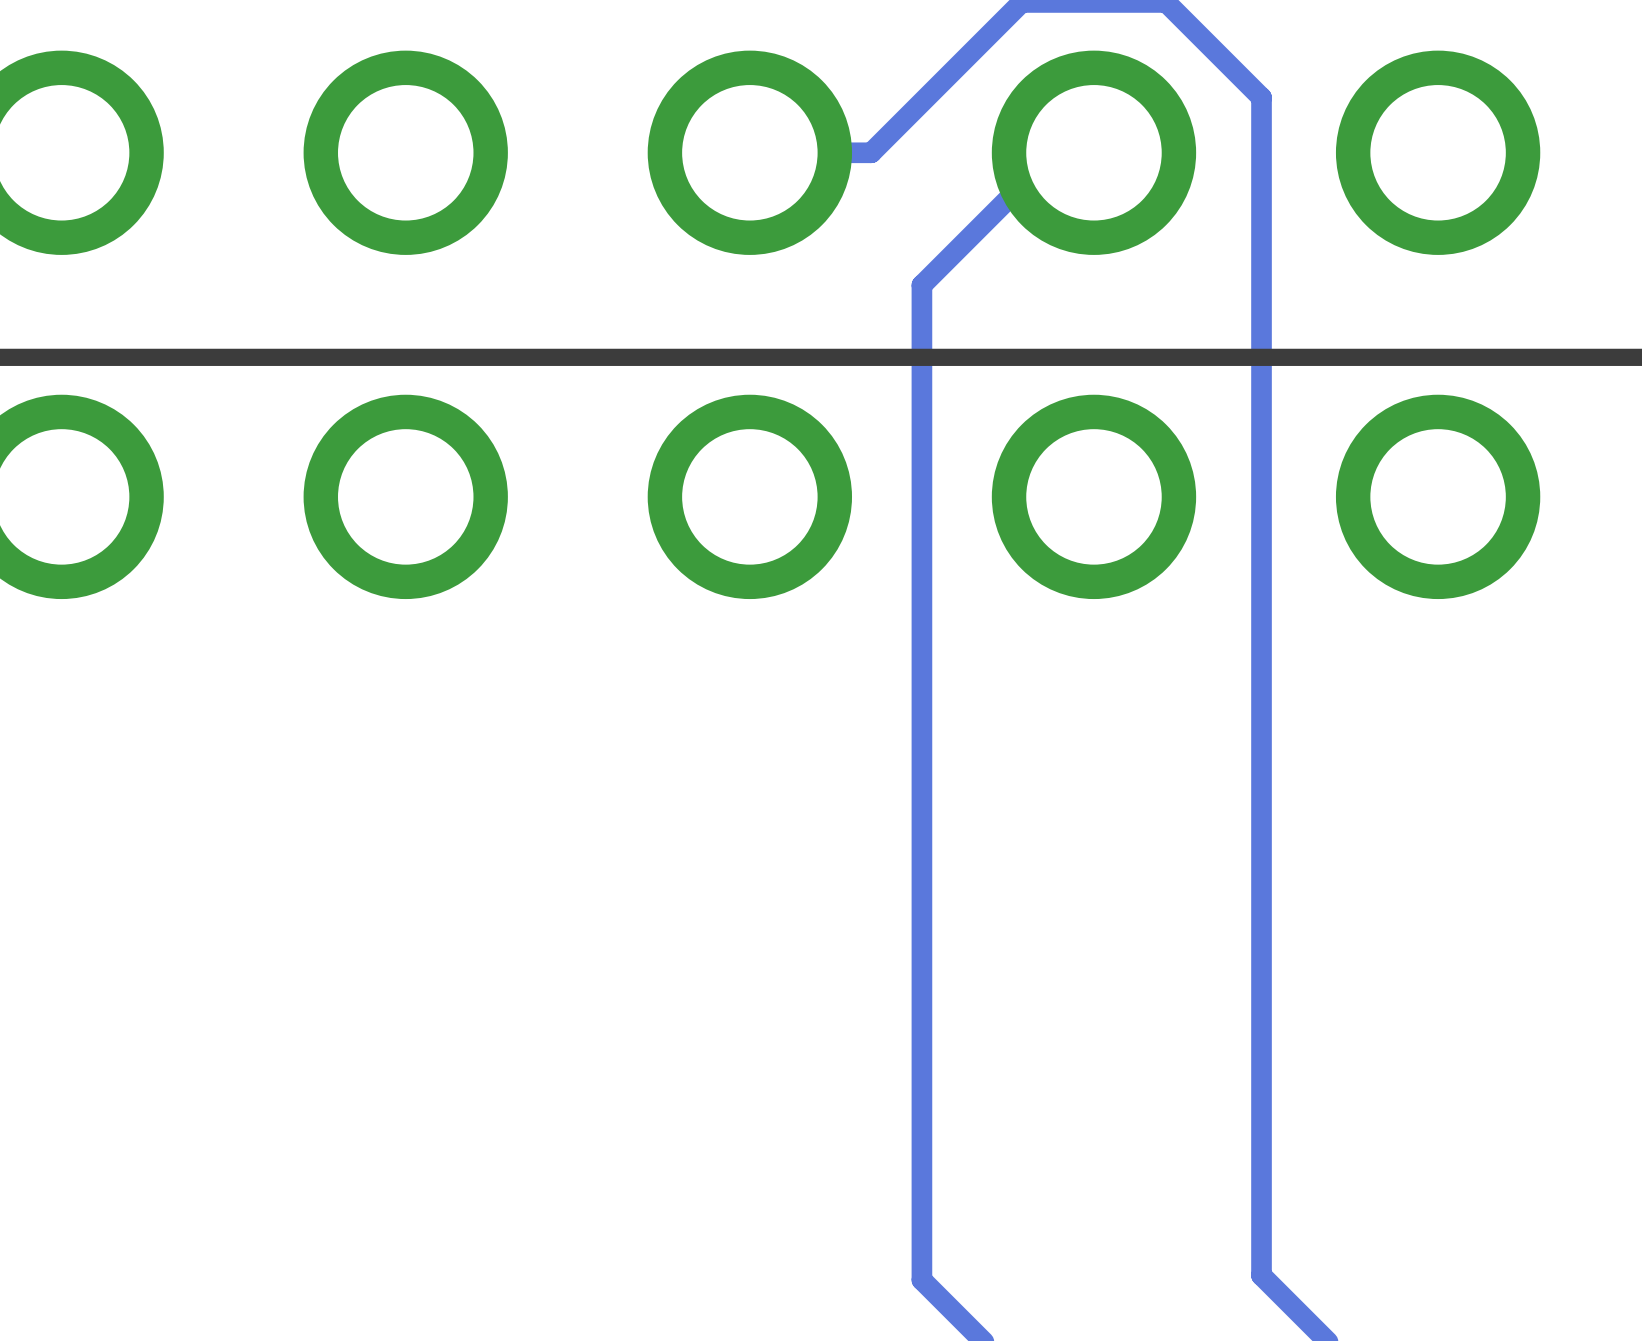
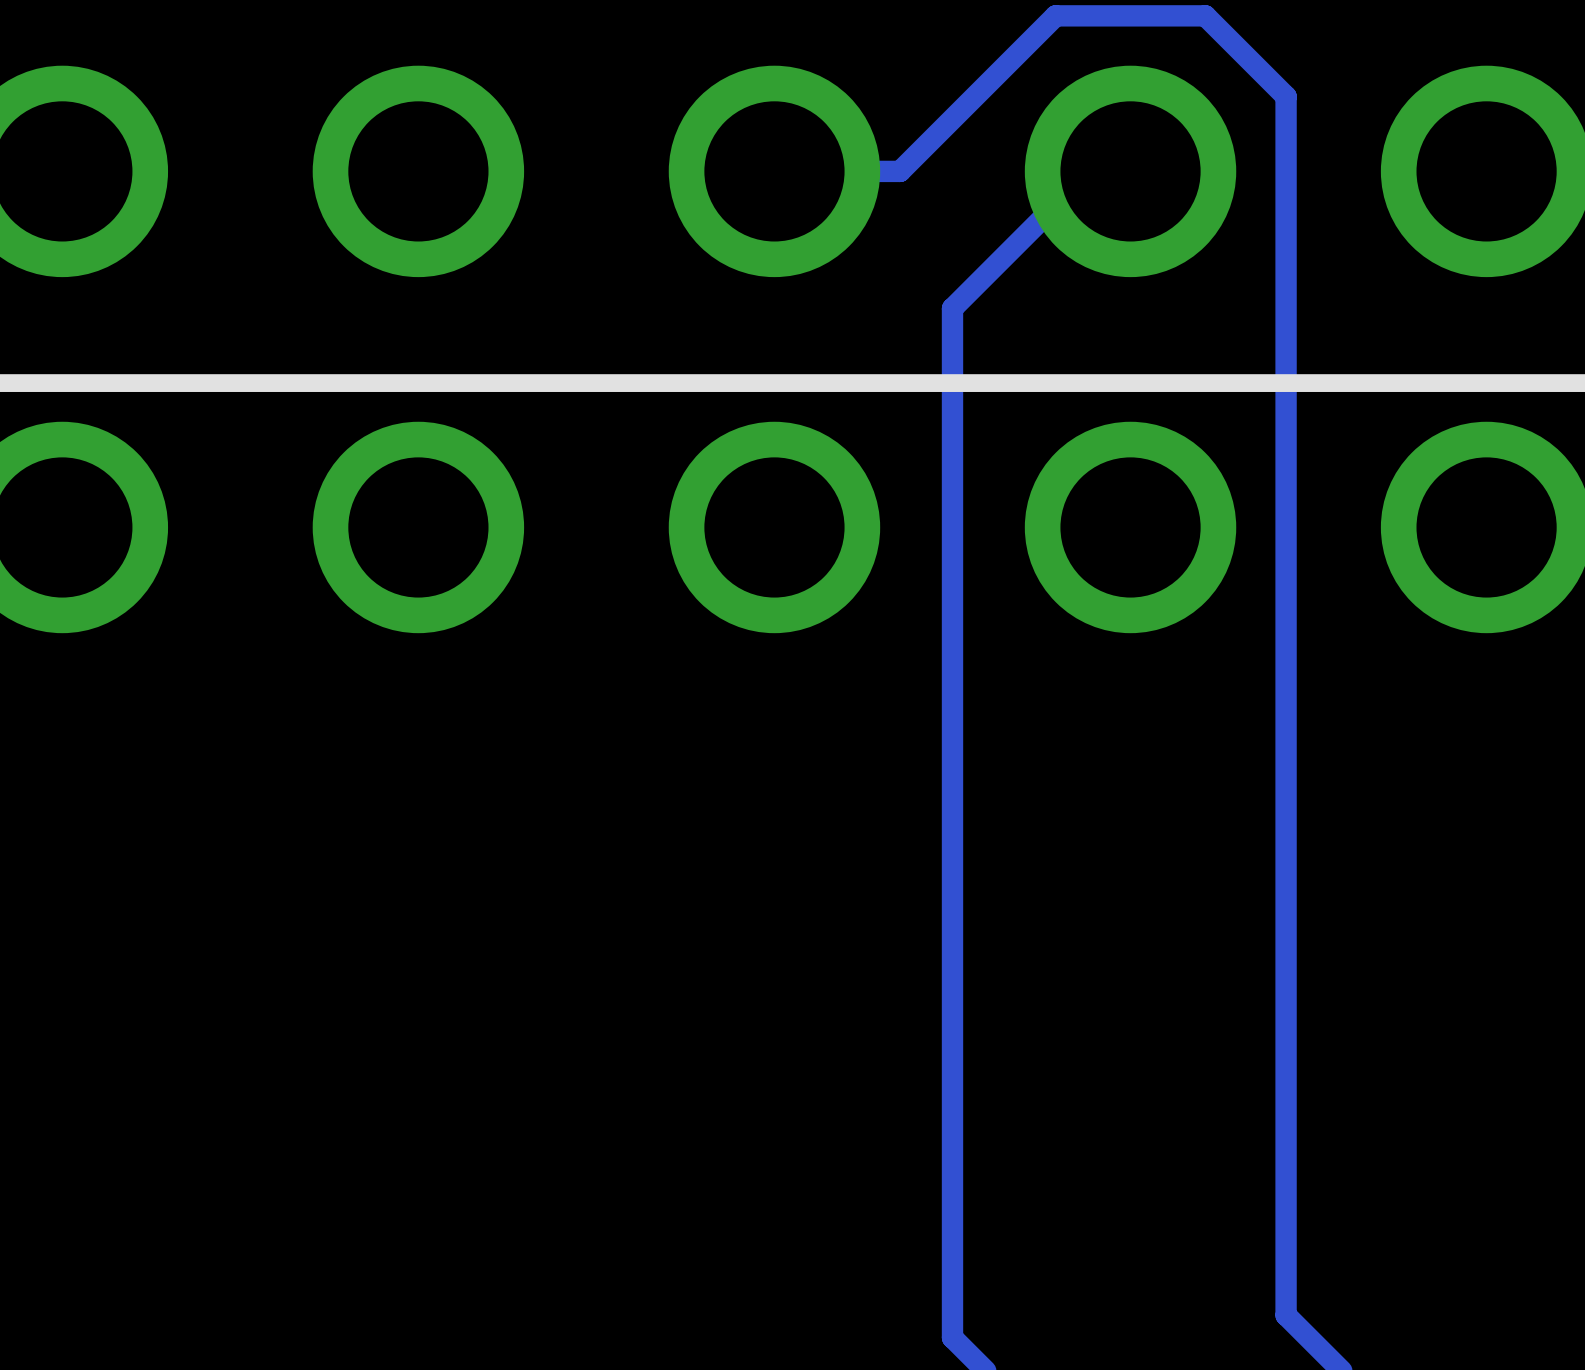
track: (1244, 80) (1261, 97) (1261, 1275) -> (1286, 96) (1286, 1315) (1303, 1333)

